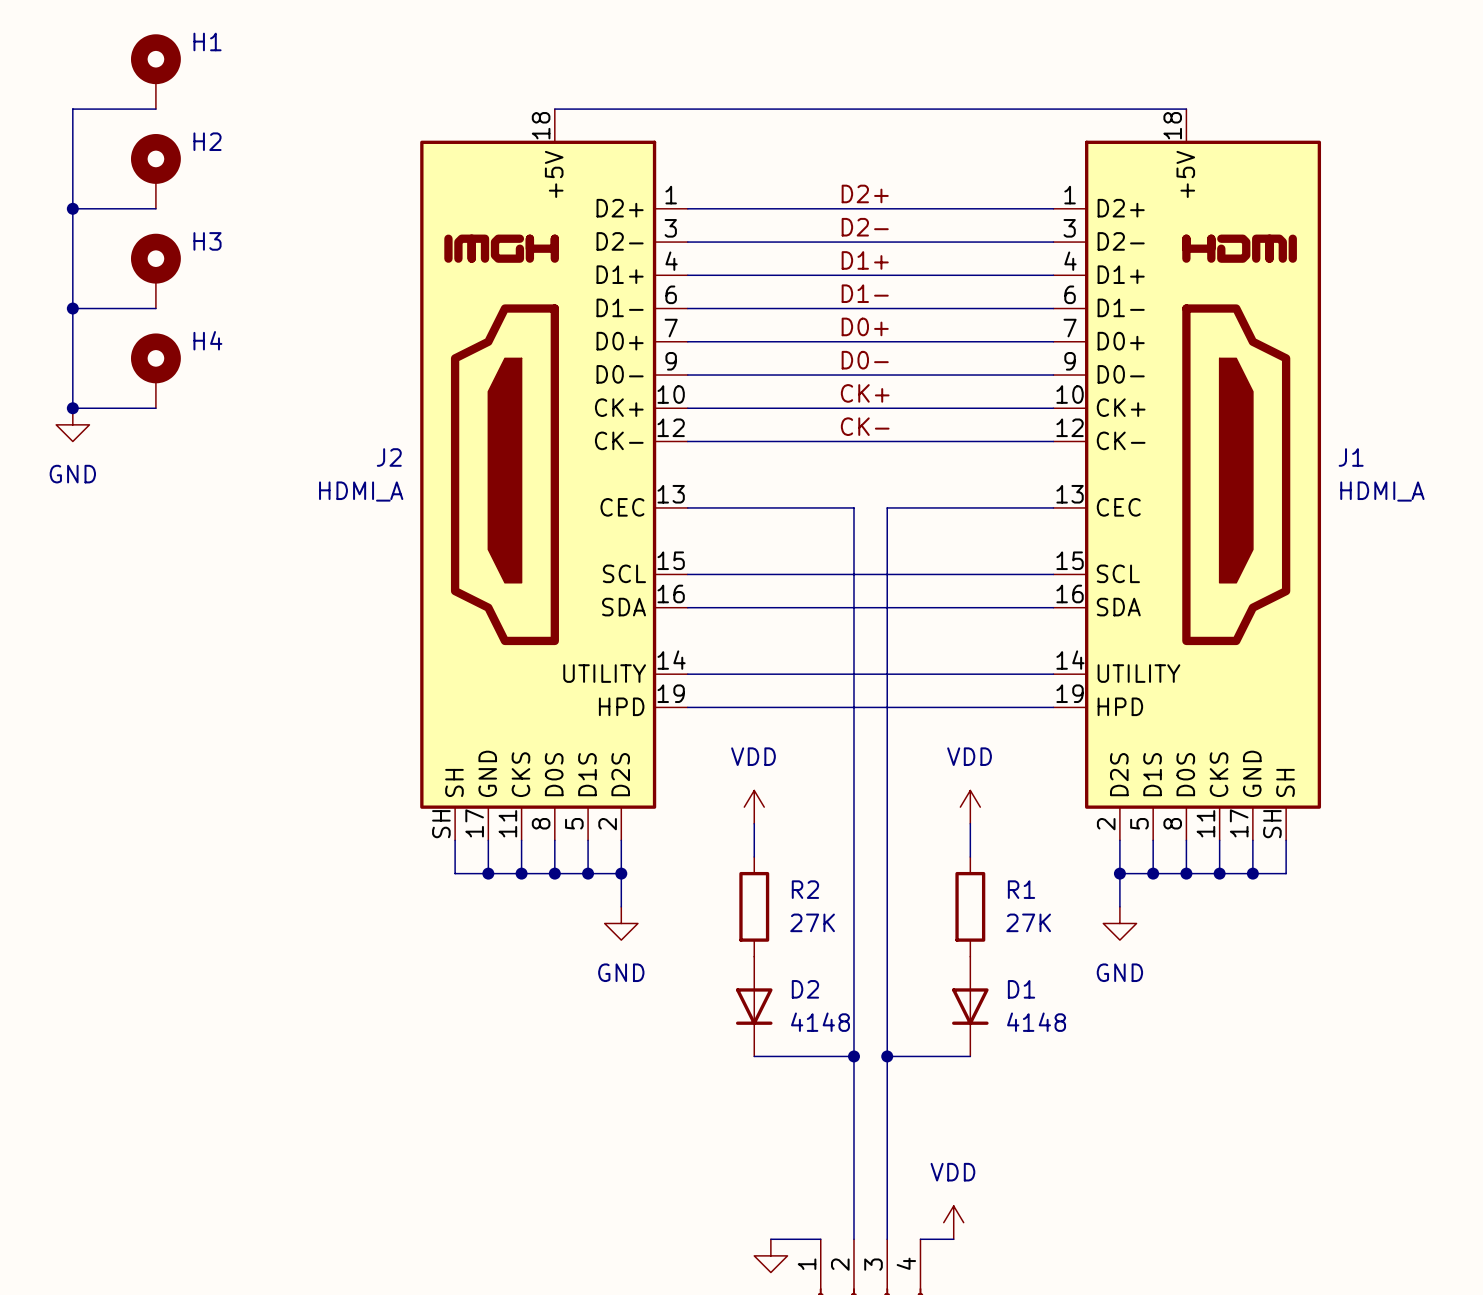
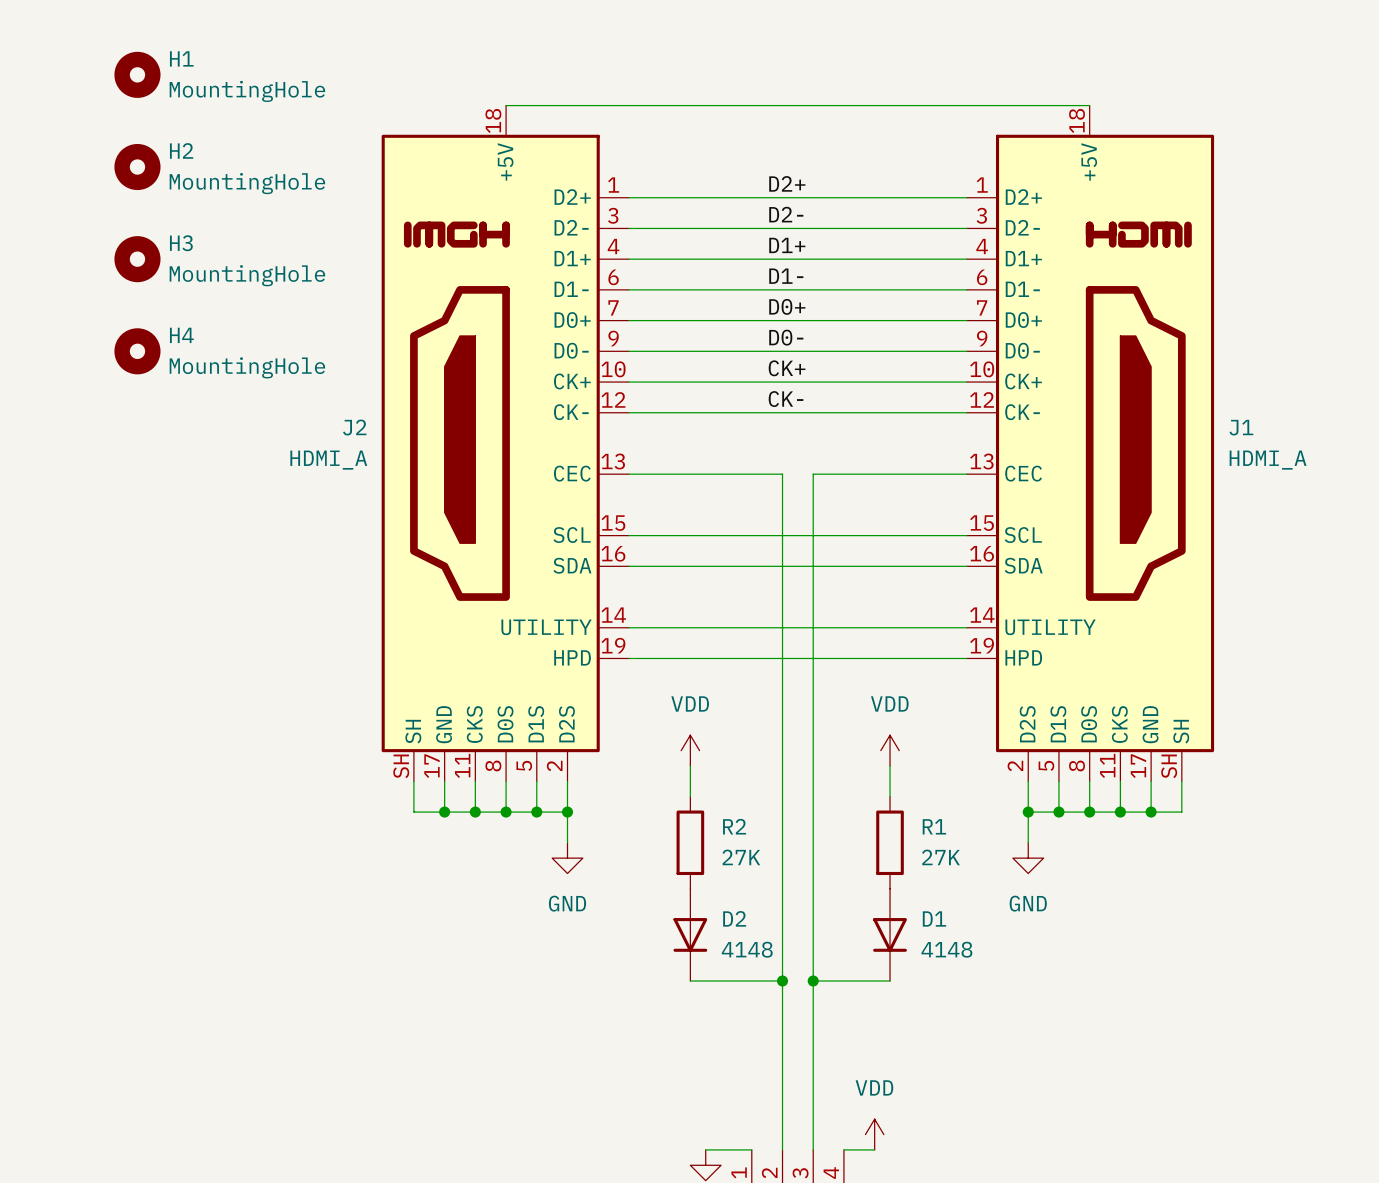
H1 symbol: [131, 34, 181, 110] -> [114, 51, 161, 98]
H1 value: none -> MountingHole (247, 91)
wire: (155, 109) (72, 109) (72, 408) (155, 408) -> none
H2 symbol: [131, 134, 181, 209] -> [114, 143, 161, 191]
H2 value: none -> MountingHole (247, 183)
wire: (72, 208) (155, 208) -> none
junction: (72, 208) -> none
H3 symbol: [131, 233, 181, 309] -> [114, 236, 161, 283]
H3 value: none -> MountingHole (247, 275)
wire: (72, 308) (155, 308) -> none
junction: (72, 308) -> none
H4 symbol: [131, 333, 181, 409] -> [114, 328, 161, 375]
H4 value: none -> MountingHole (247, 367)
junction: (72, 408) -> none
power symbol: GND (72, 424) -> none

